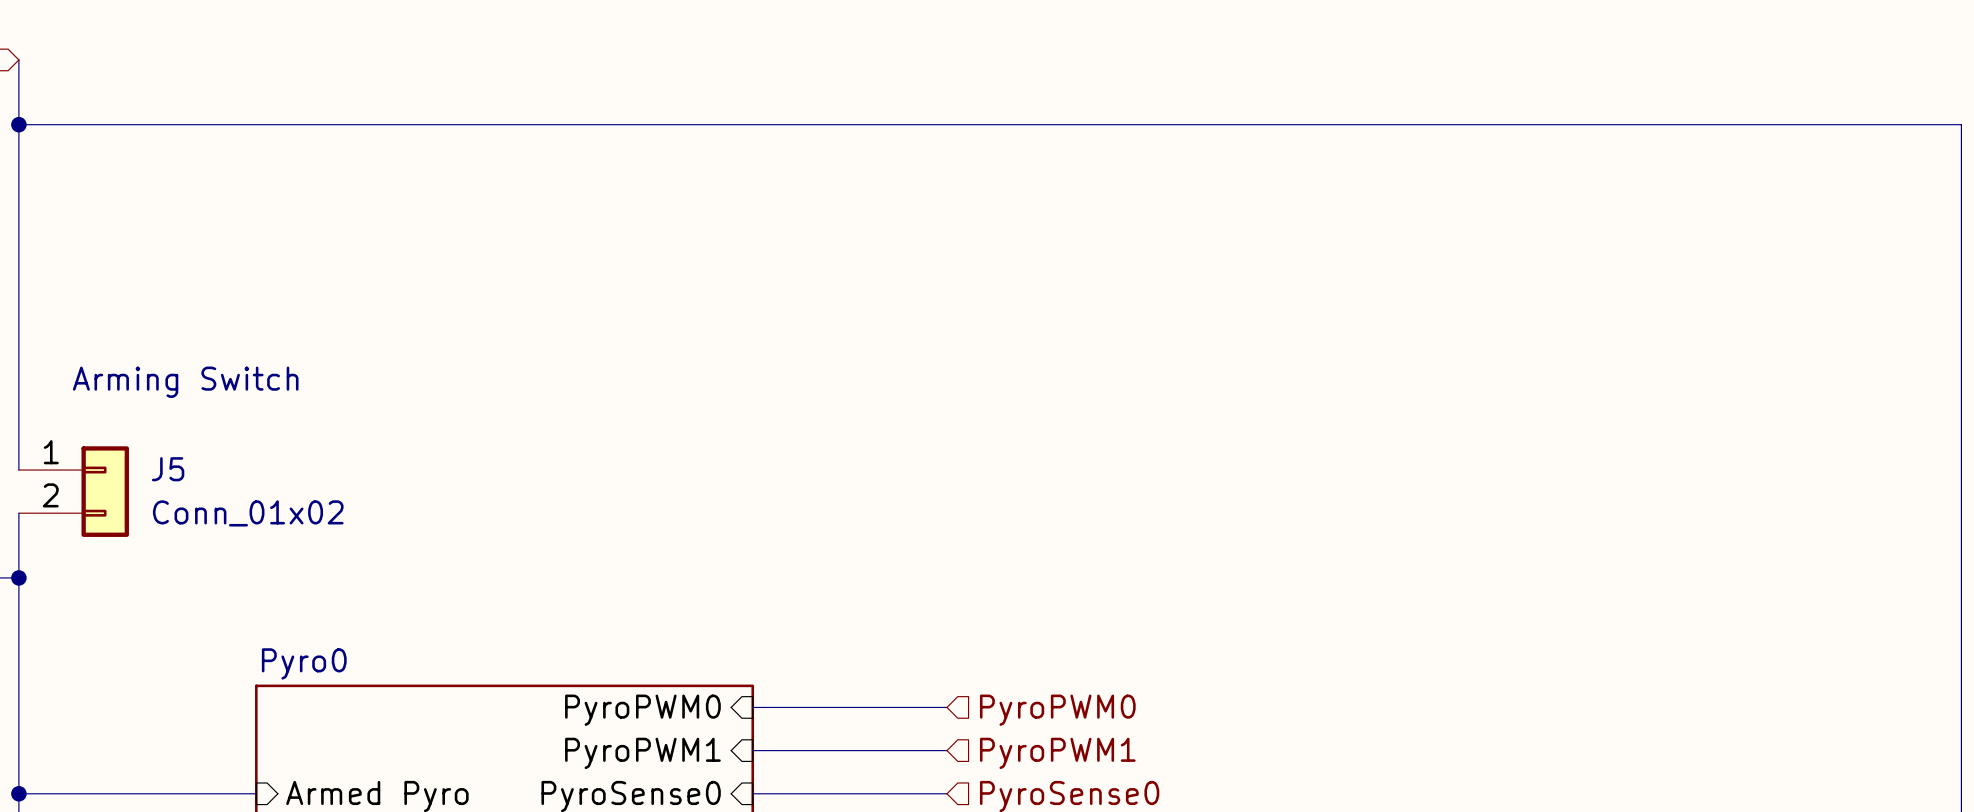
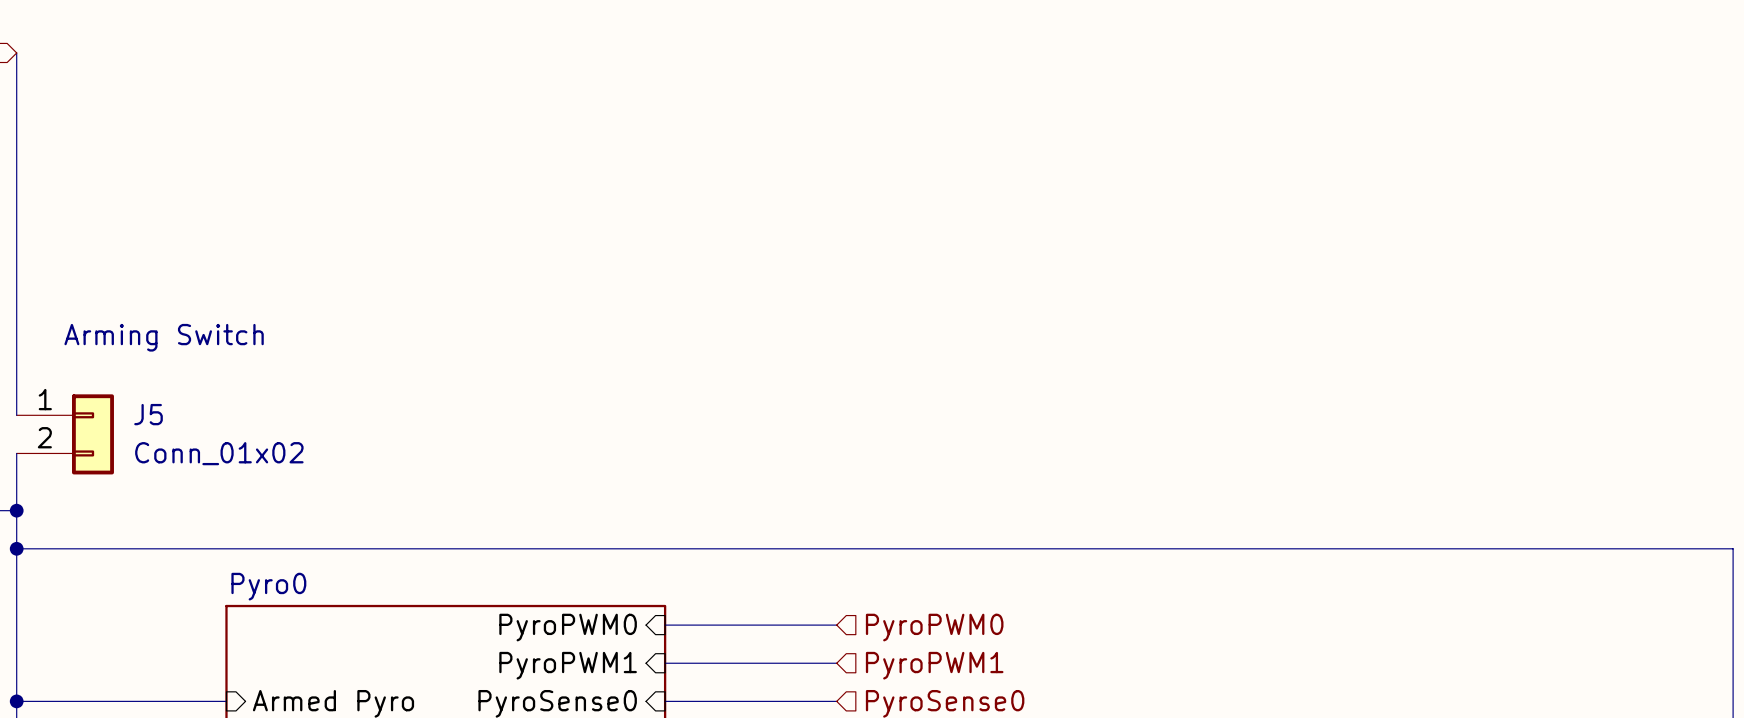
wire: (18, 124) (1961, 124) (1961, 621) -> (16, 548) (1733, 548)
junction: (18, 124) -> none
junction: none -> (16, 548)

